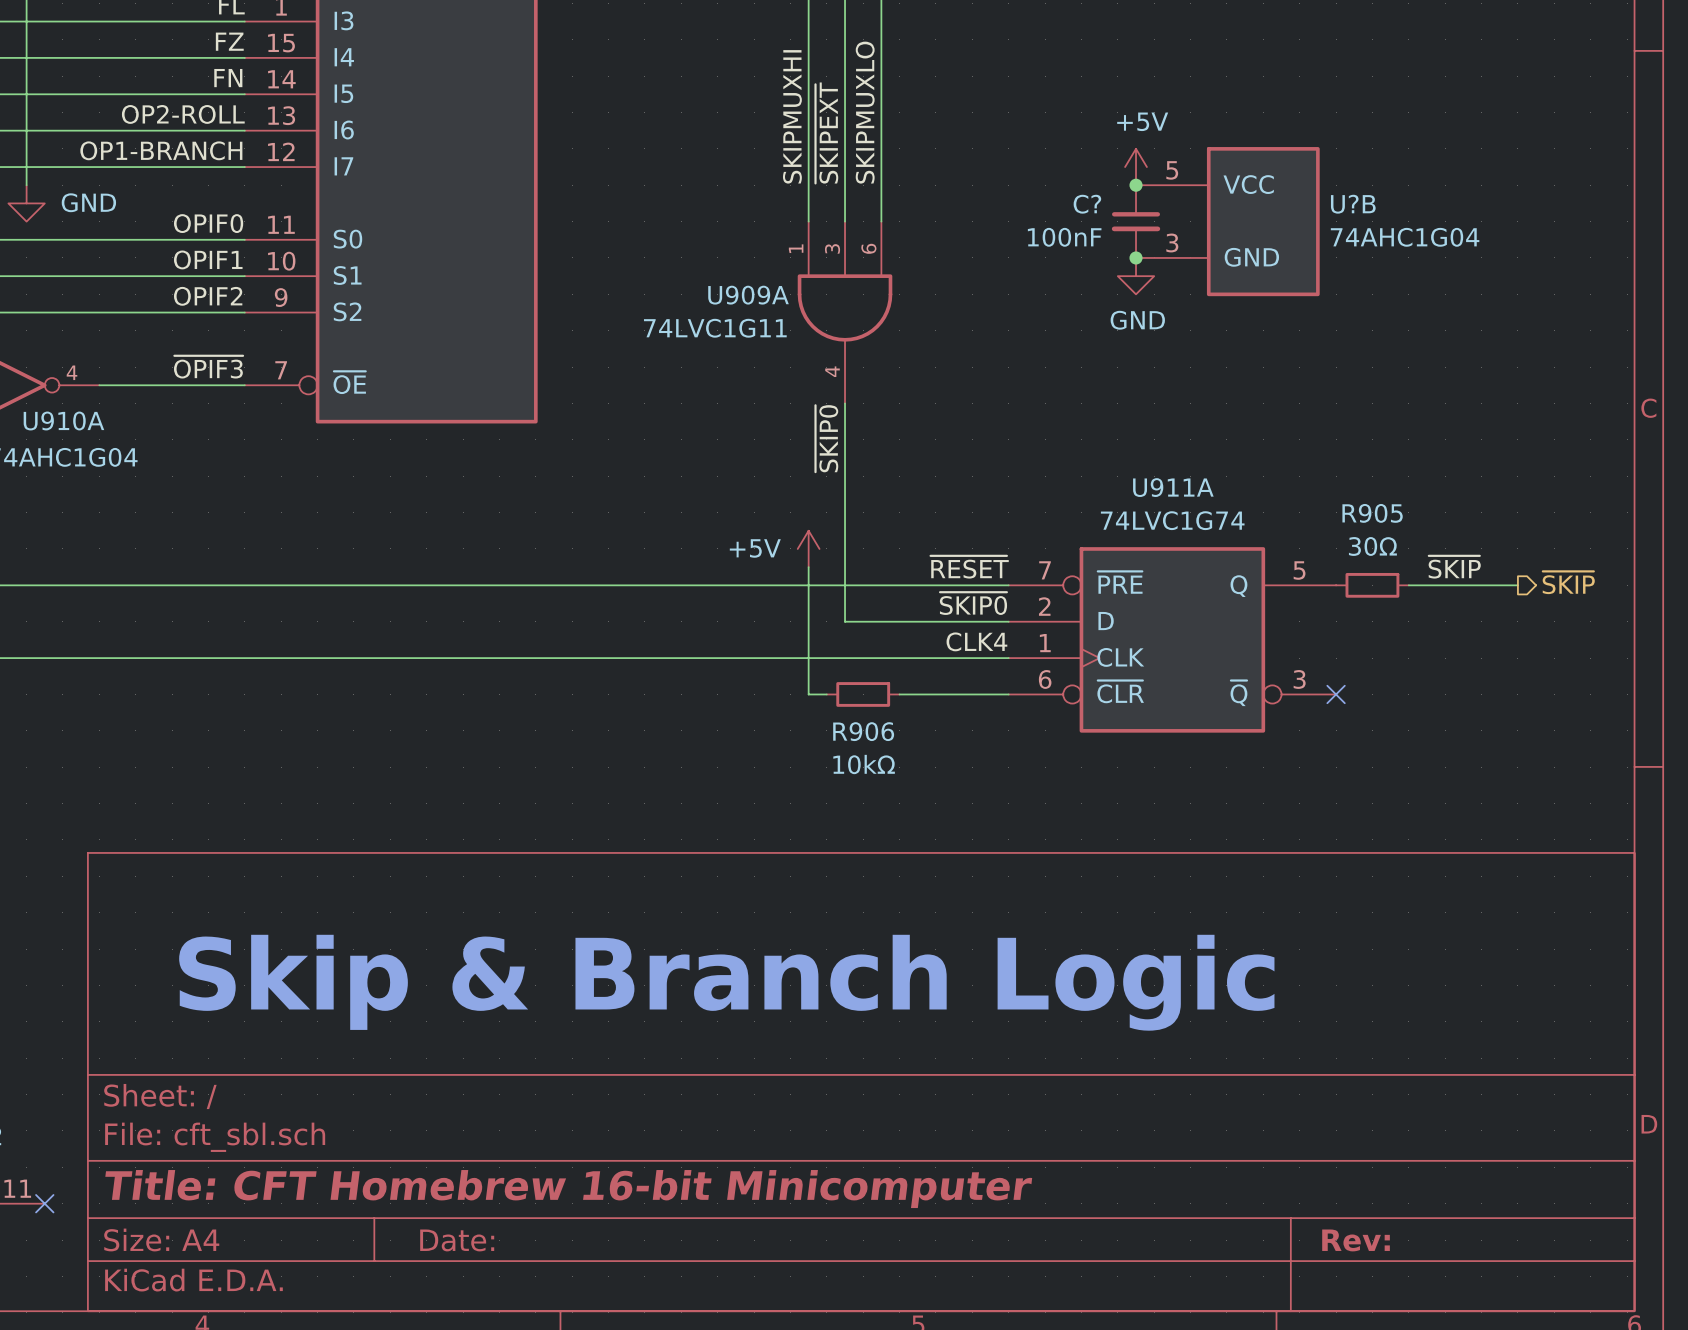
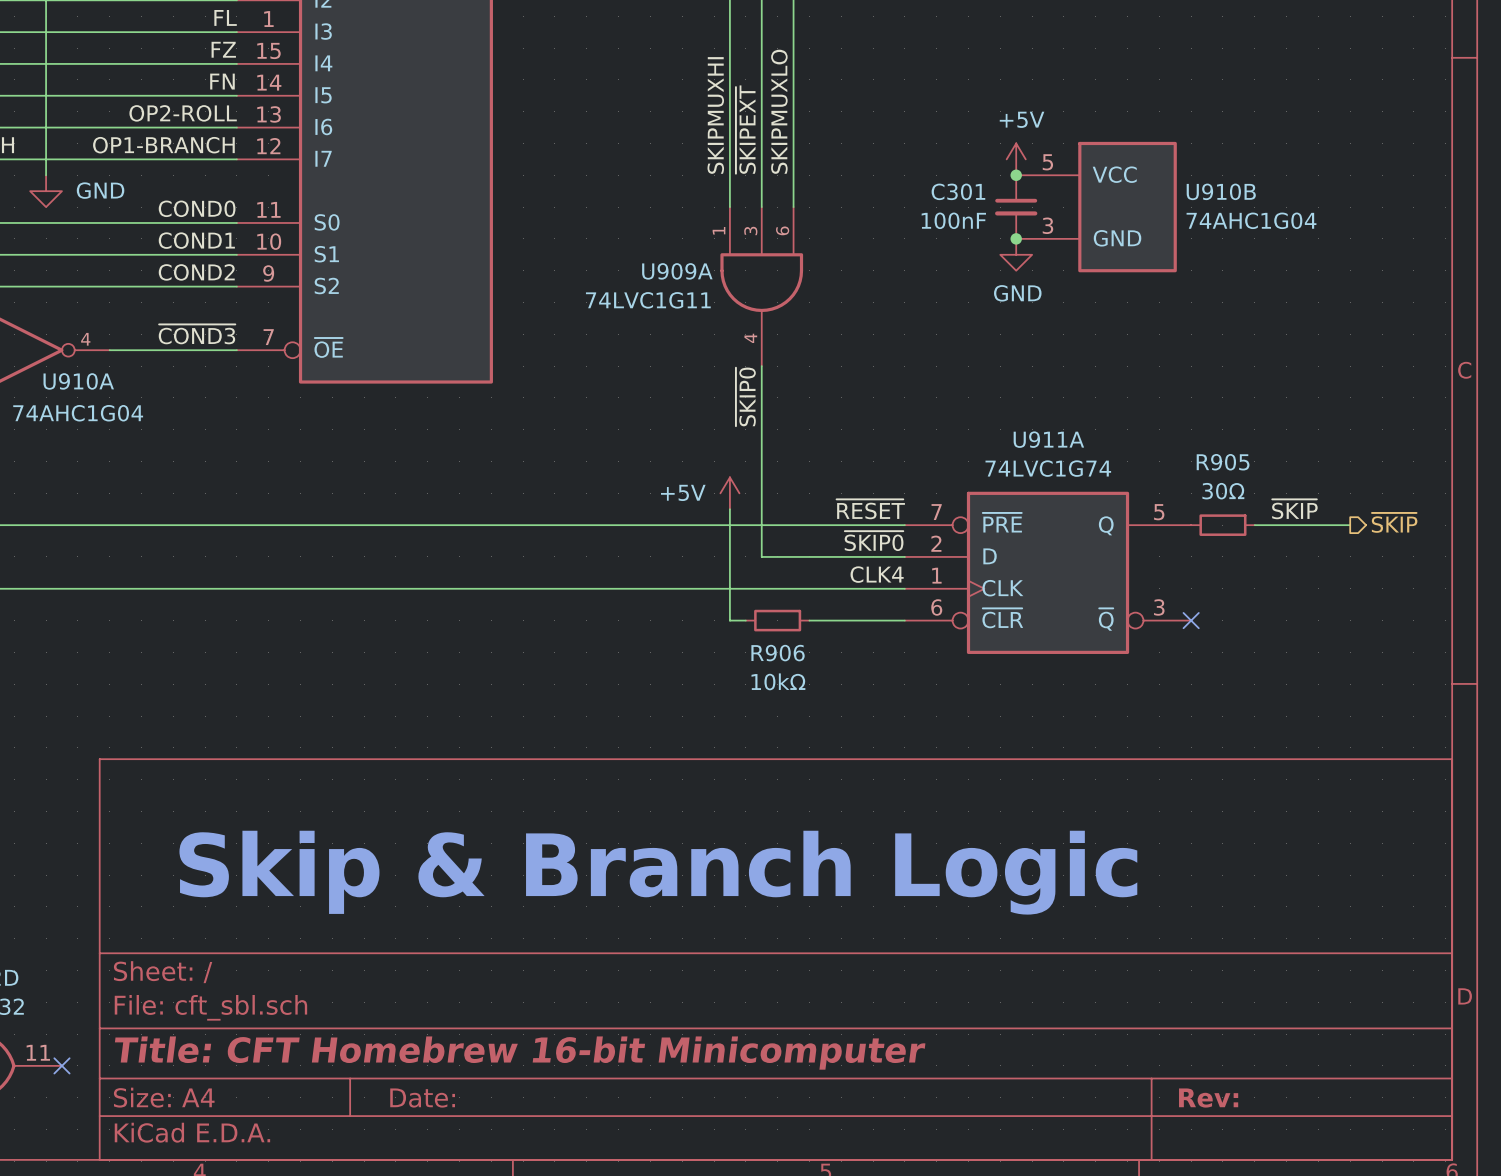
C? name: C? (1087, 204) -> C301 (958, 191)
U?B name: U?B (1353, 204) -> U910B (1221, 191)
label: OPIF0 (208, 223) -> COND0 (197, 208)
label: OPIF1 (208, 259) -> COND1 (196, 240)
label: OPIF2 (208, 296) -> COND2 (196, 272)
label: ~{OPIF3} (208, 367) -> ~{COND3} (197, 334)

